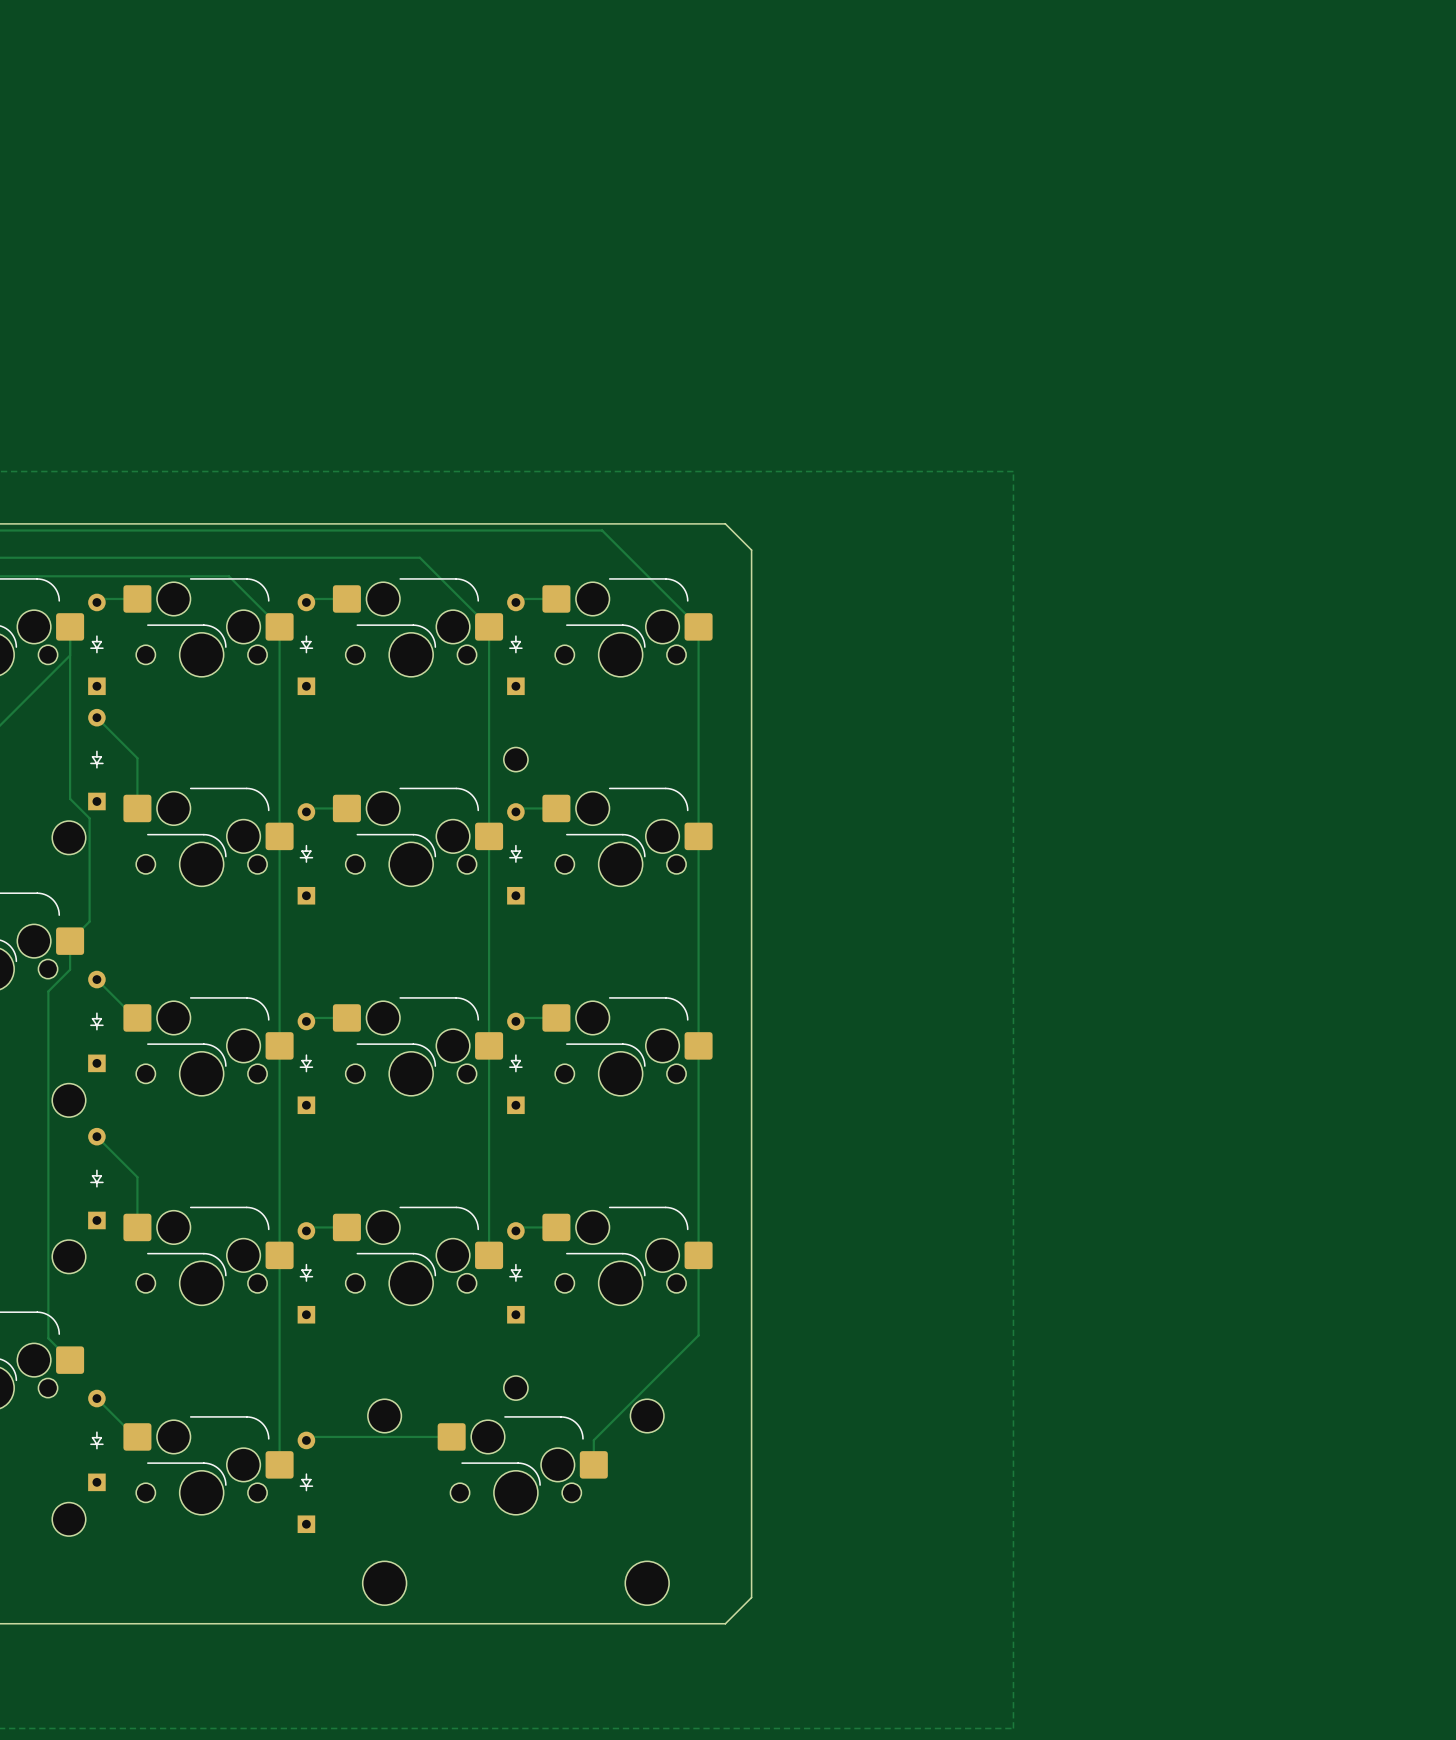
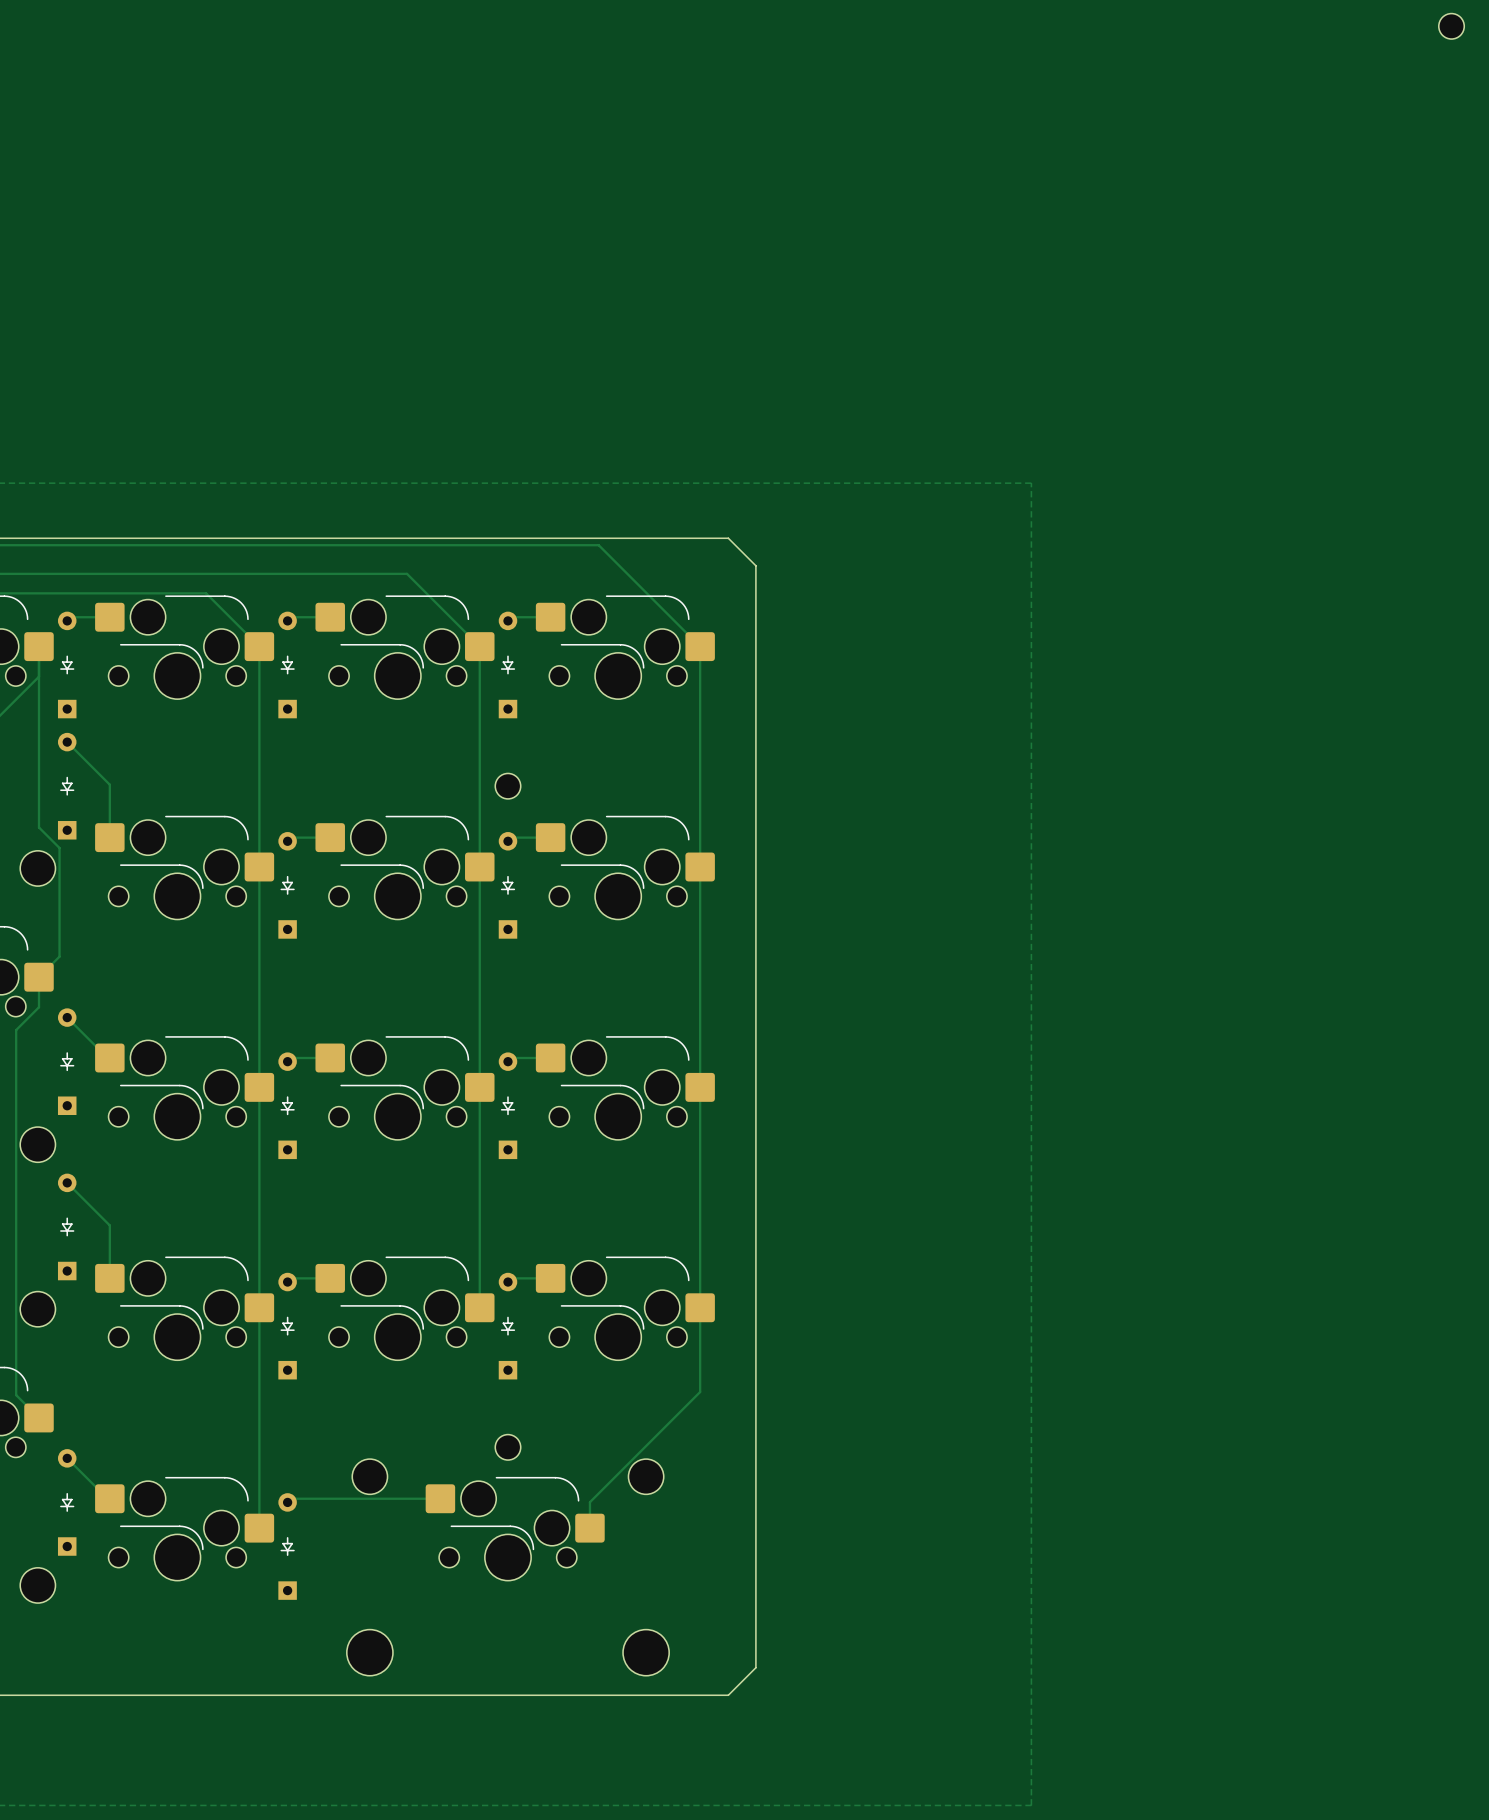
part: none -> (1451, 26)

